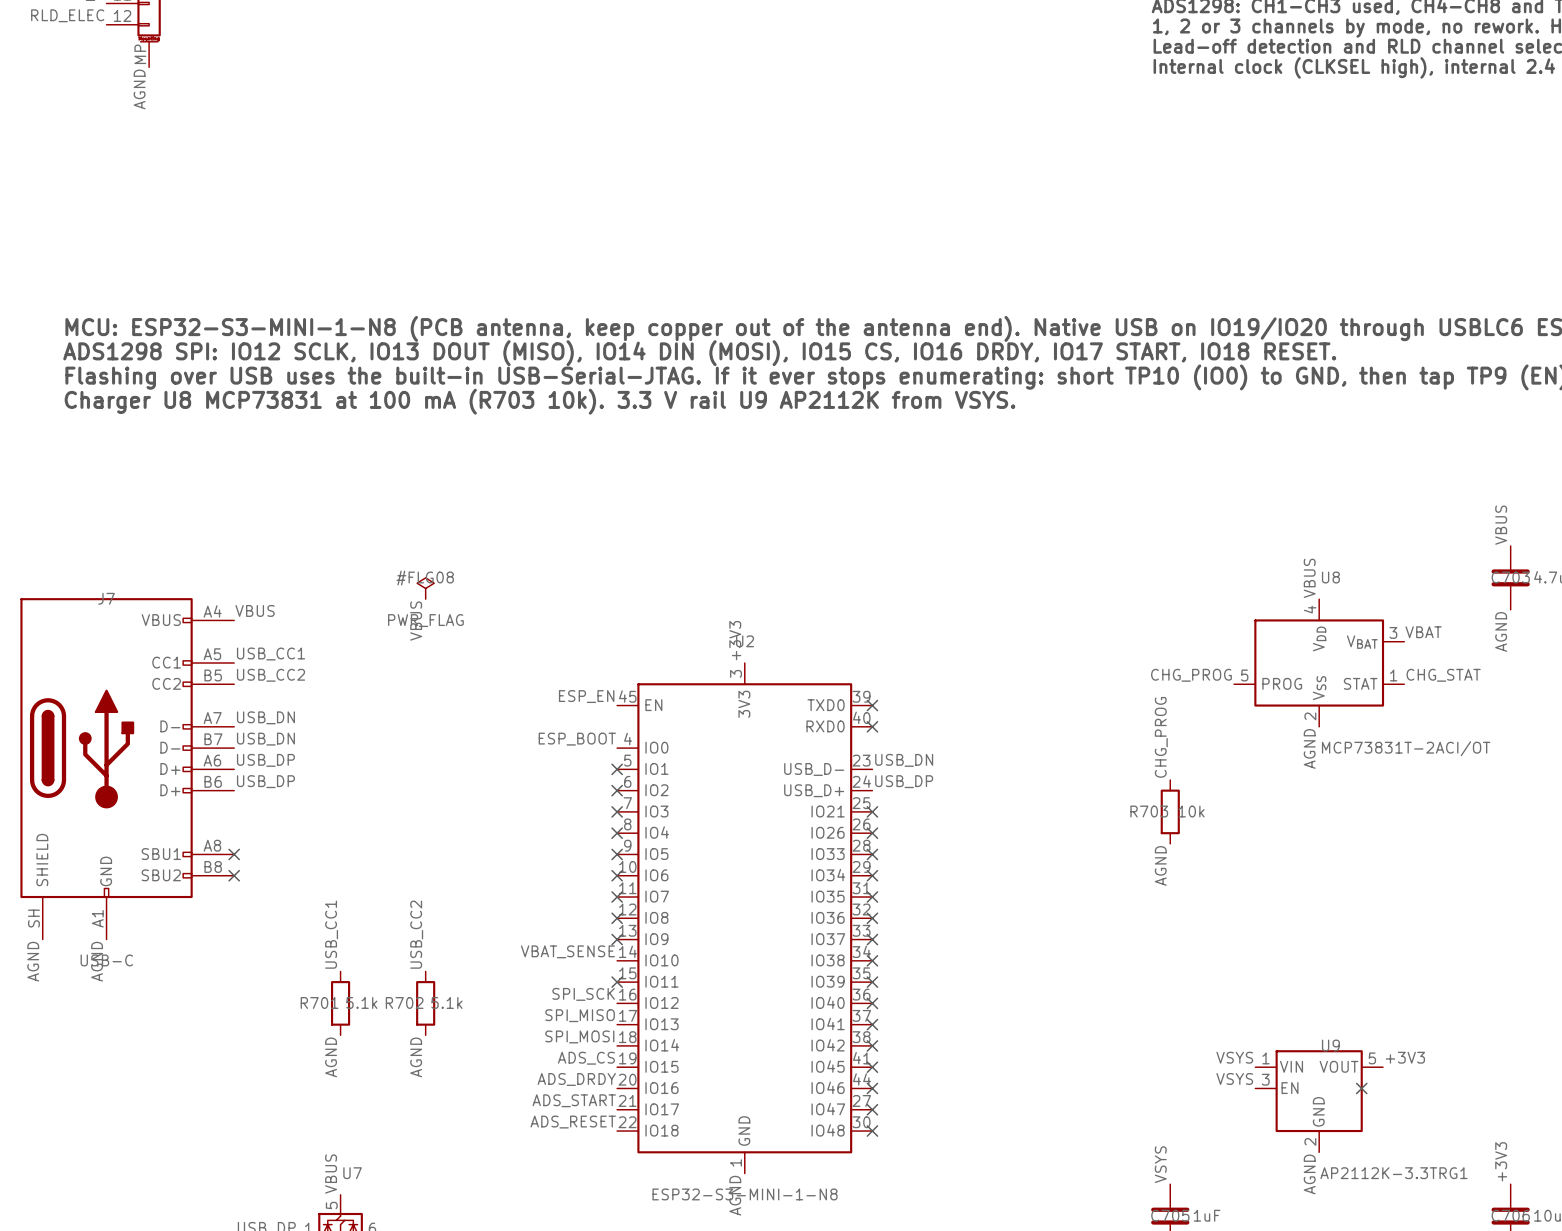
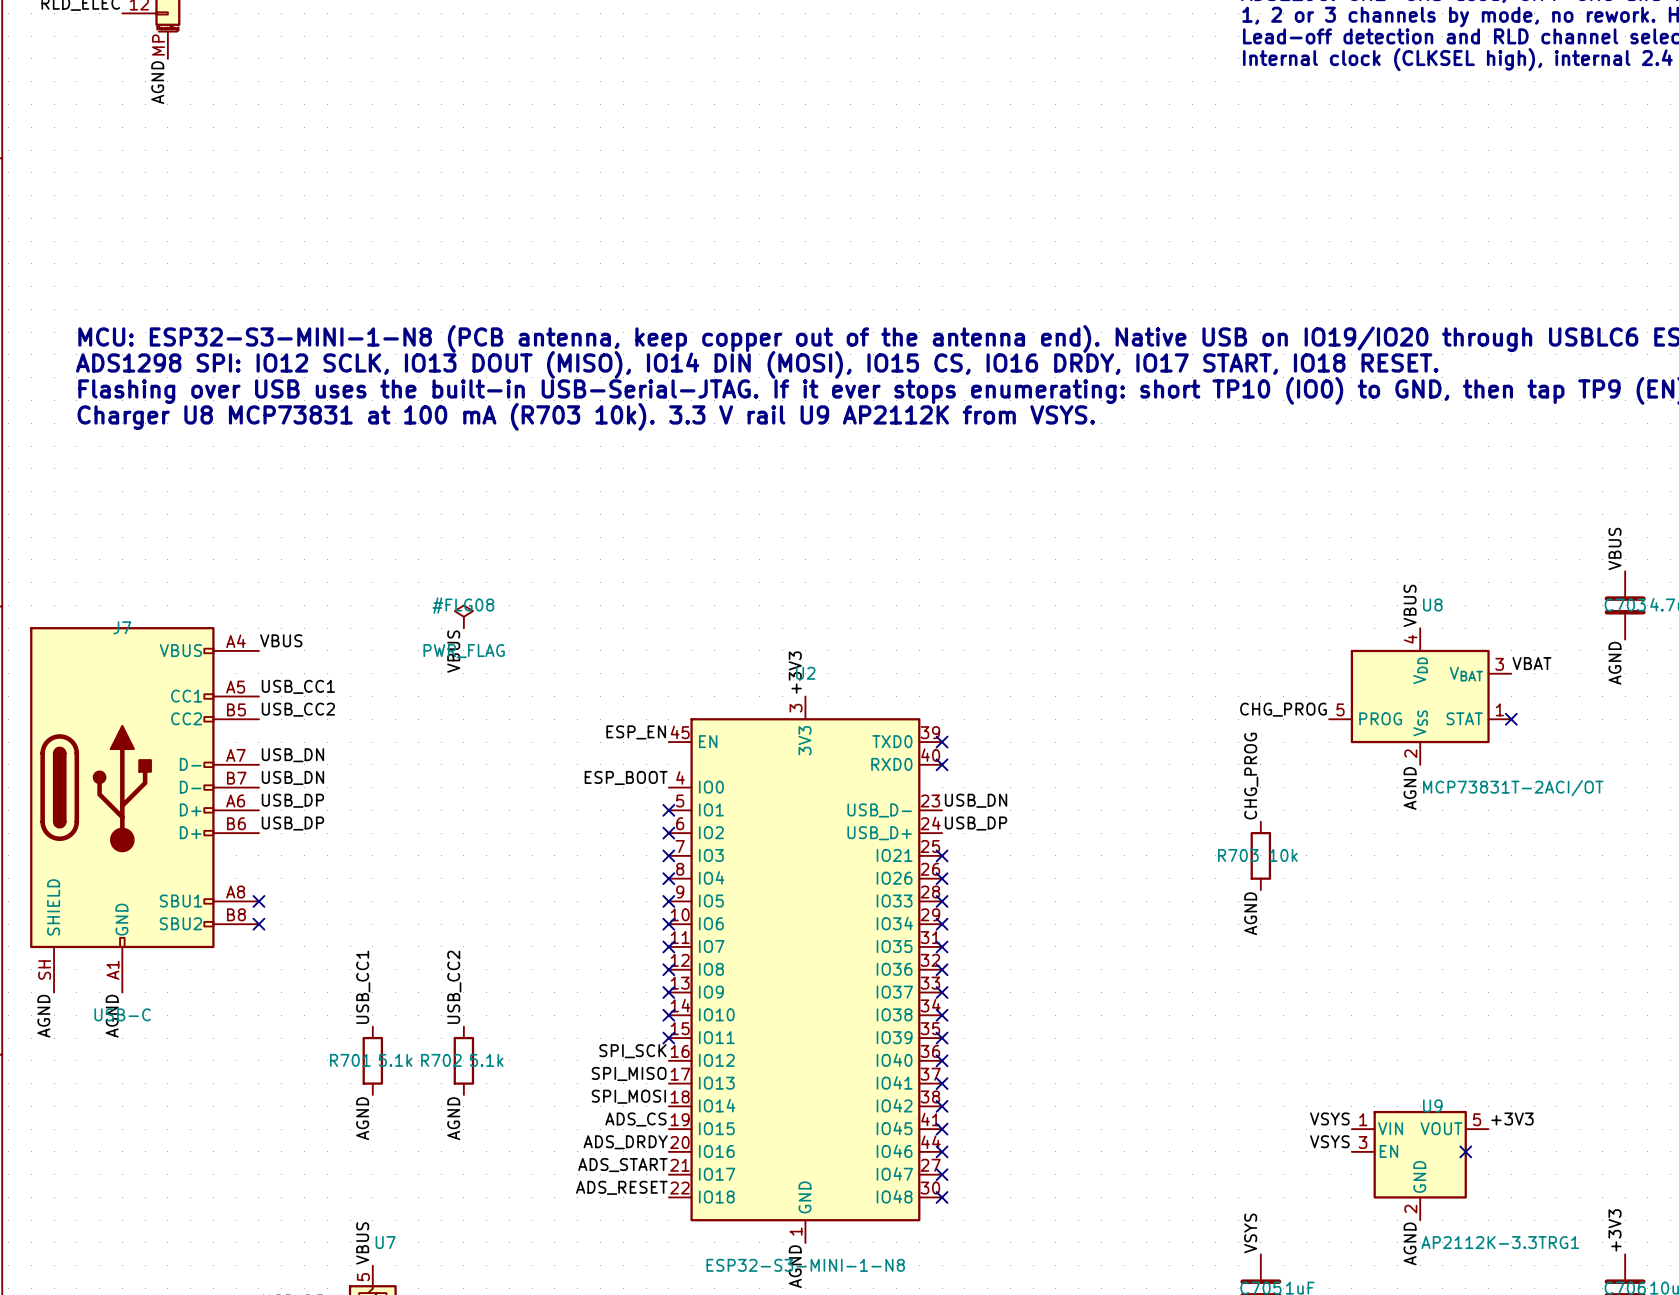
label: CHG_STAT (1443, 675) -> none
no-connect mark: none -> (1511, 719)
label: VBAT_SENSE (567, 951) -> none
no-connect mark: none -> (668, 1015)

